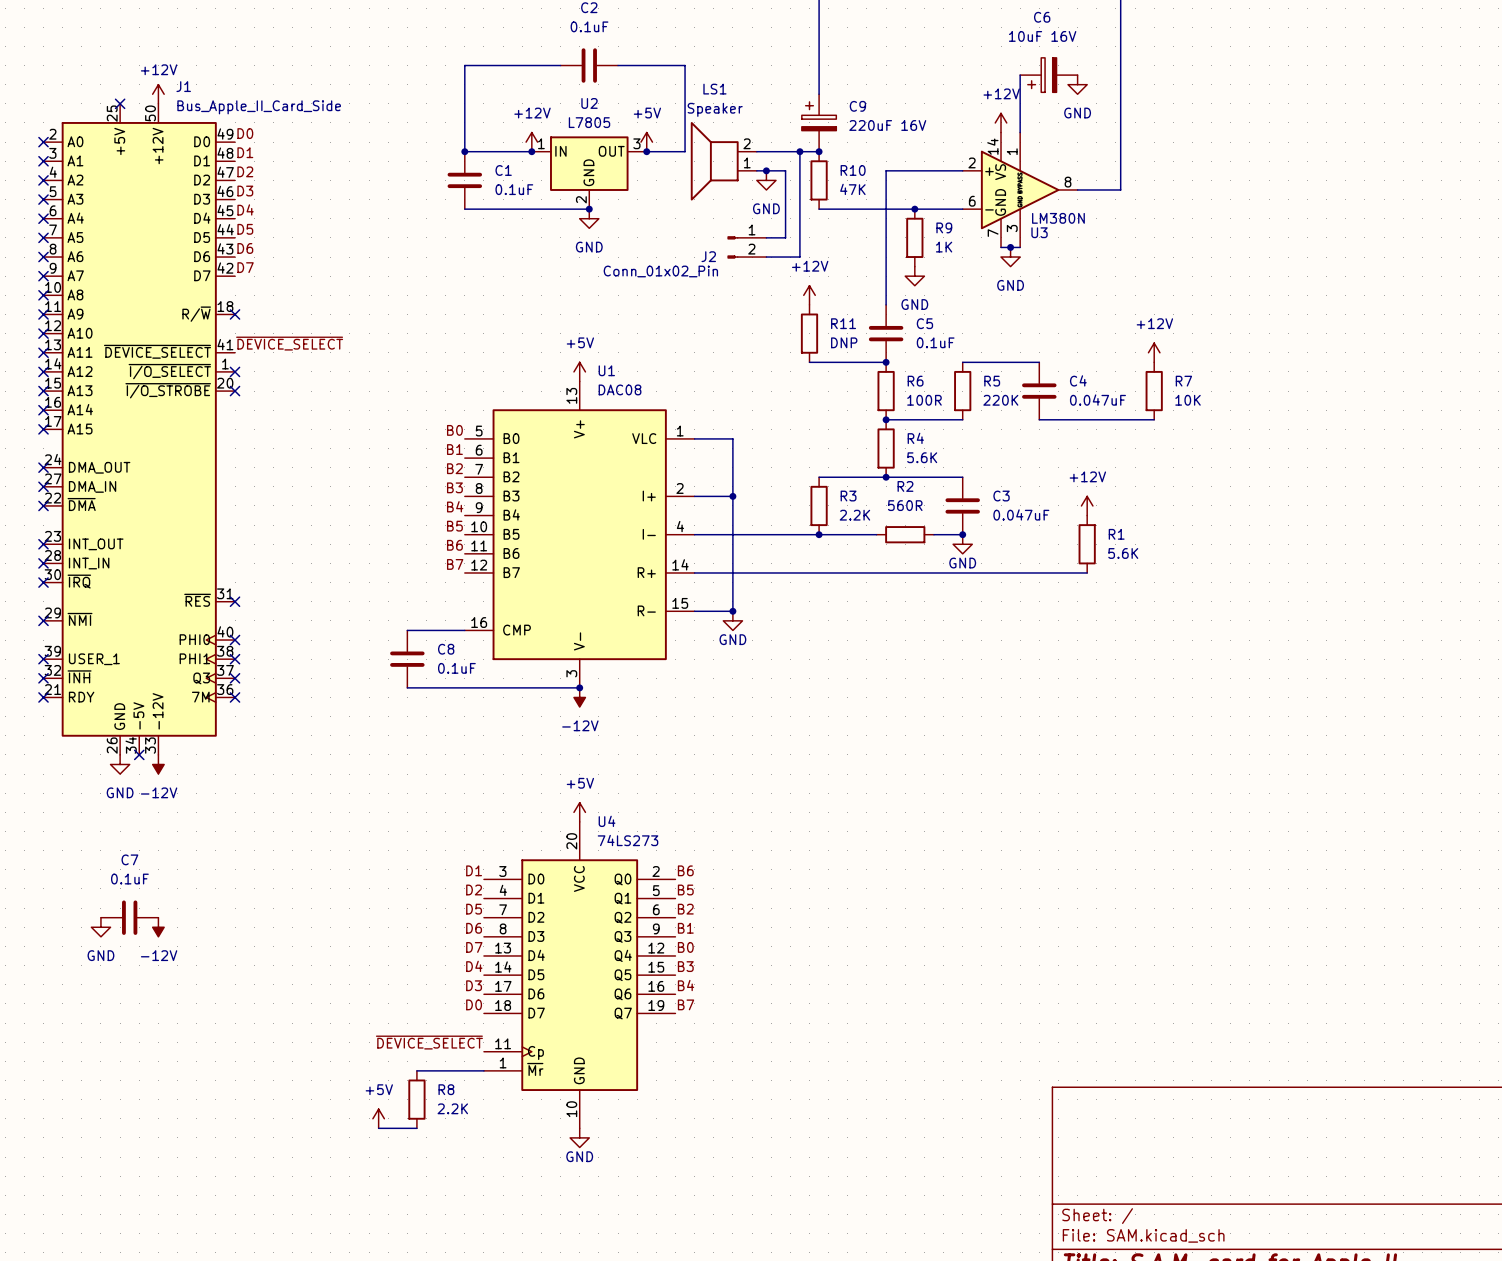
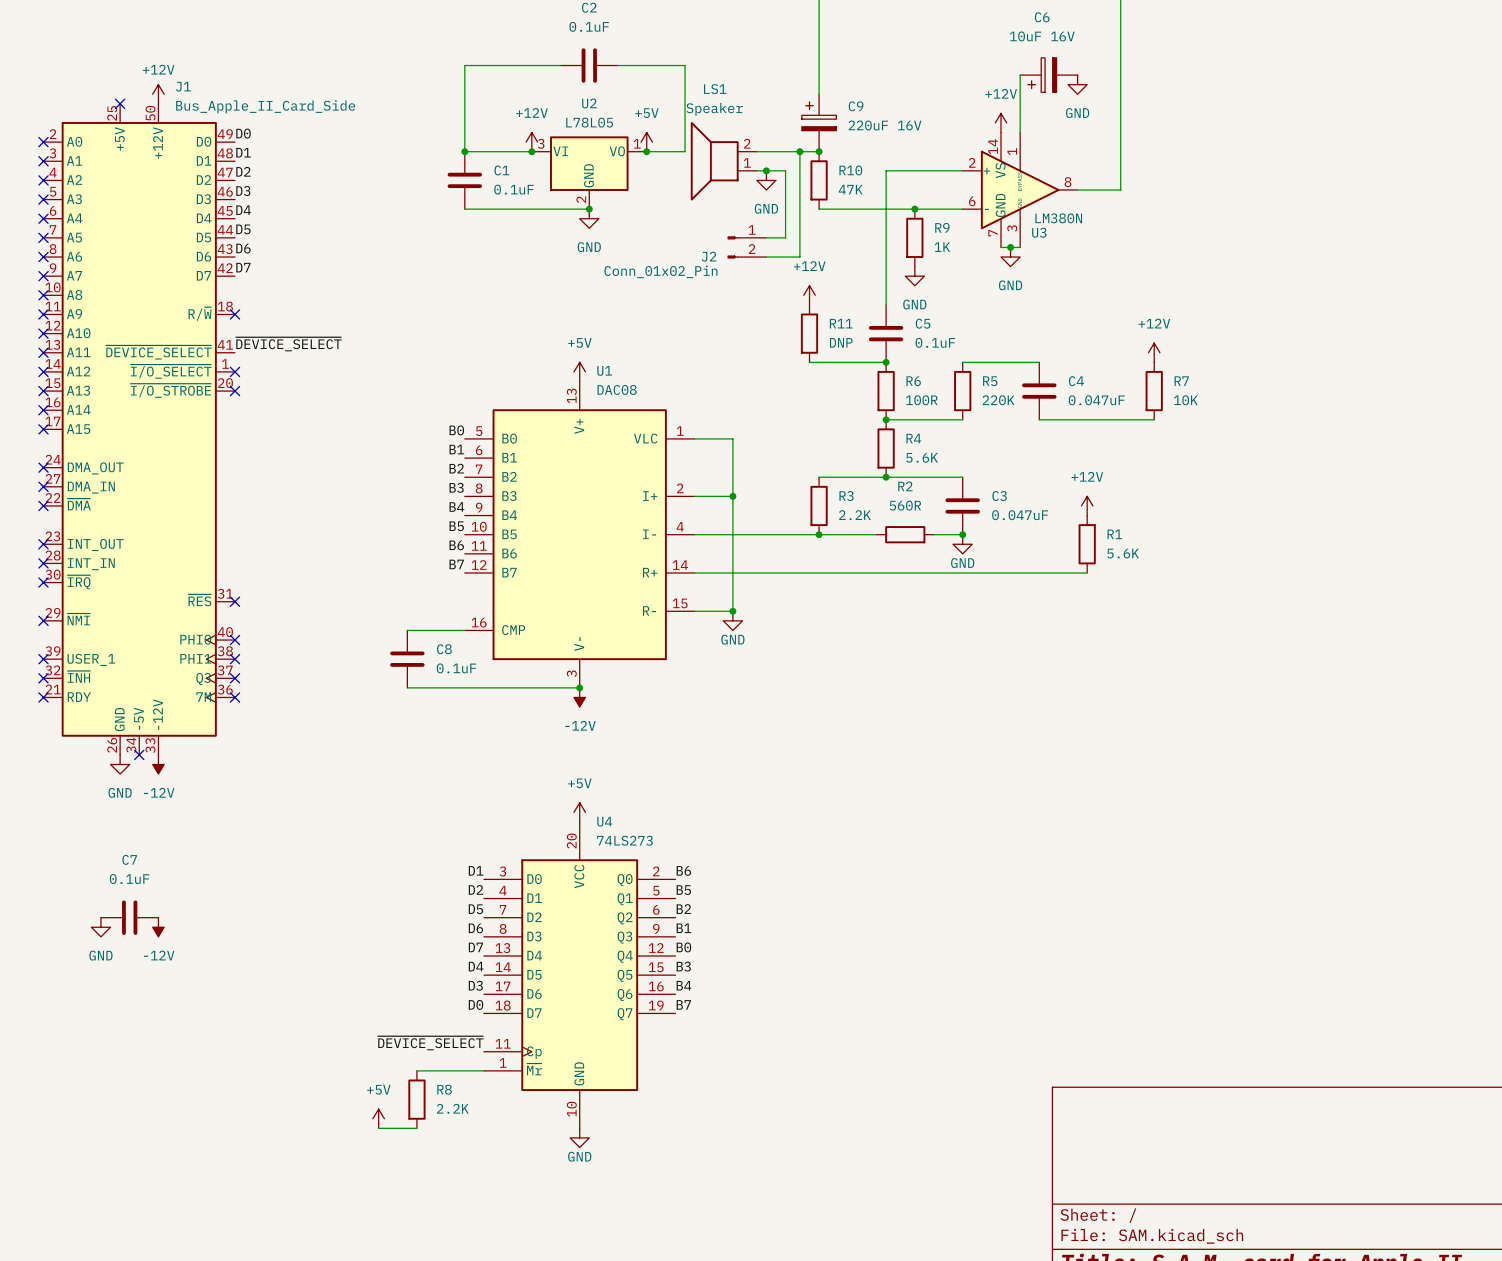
U2 value: L7805 (589, 122) -> L78L05 (589, 122)
U2 pin number: 1 (541, 143) -> 3 (541, 143)
U2 pin number: 3 (636, 143) -> 1 (637, 143)
U2 pin name: IN (560, 151) -> VI (560, 151)
U2 pin name: OUT (611, 151) -> VO (617, 151)

